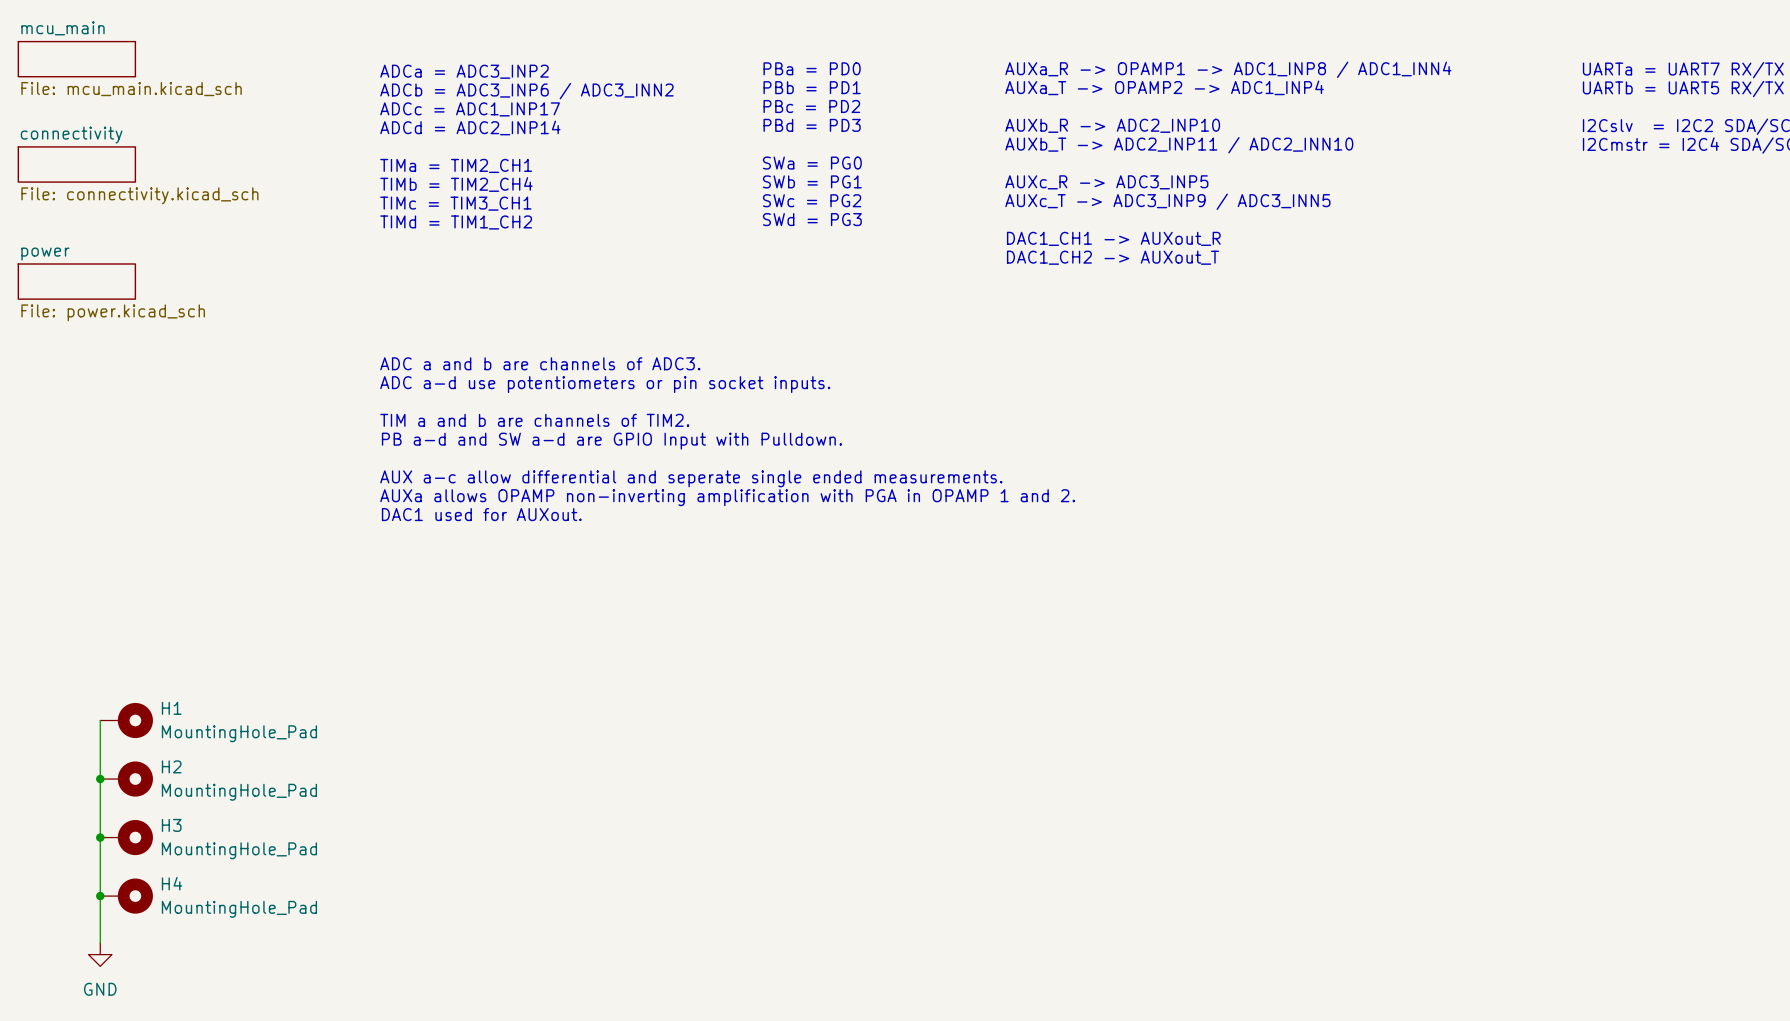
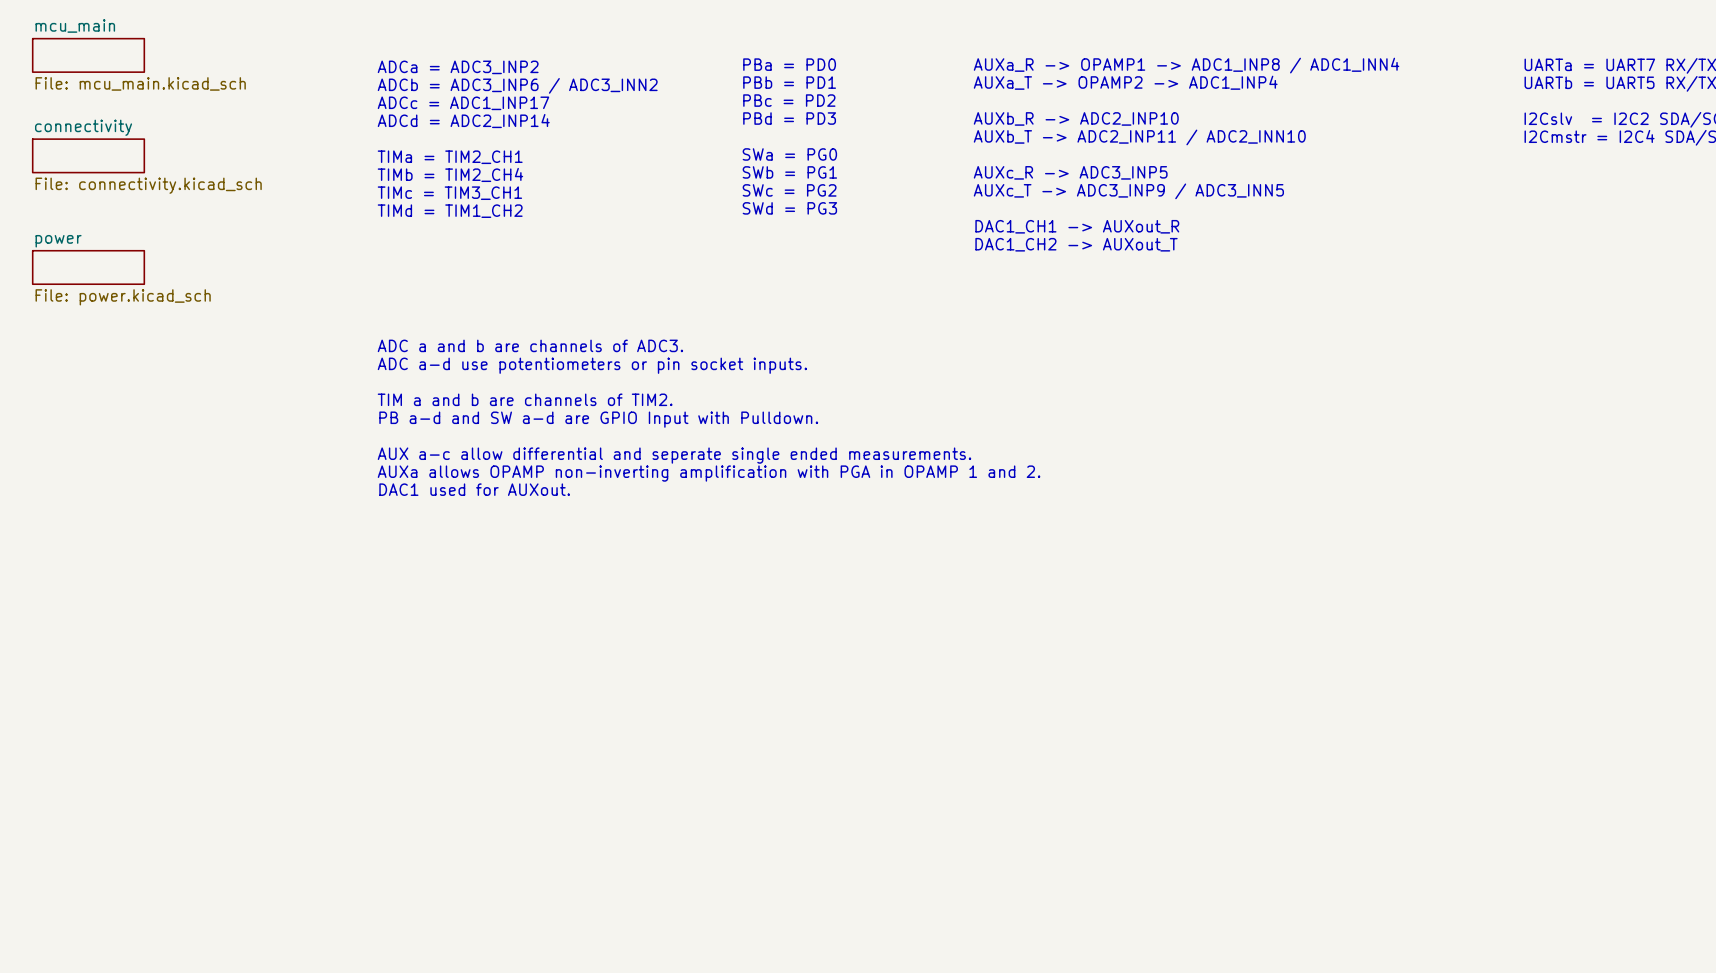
wire: (100, 720) (100, 942) -> none
H1: MountingHole_Pad (126, 720) -> none
junction: (100, 779) -> none
H2: MountingHole_Pad (126, 779) -> none
junction: (100, 837) -> none
H3: MountingHole_Pad (126, 837) -> none
junction: (100, 896) -> none
H4: MountingHole_Pad (126, 896) -> none
power symbol: GND (100, 954) -> none

